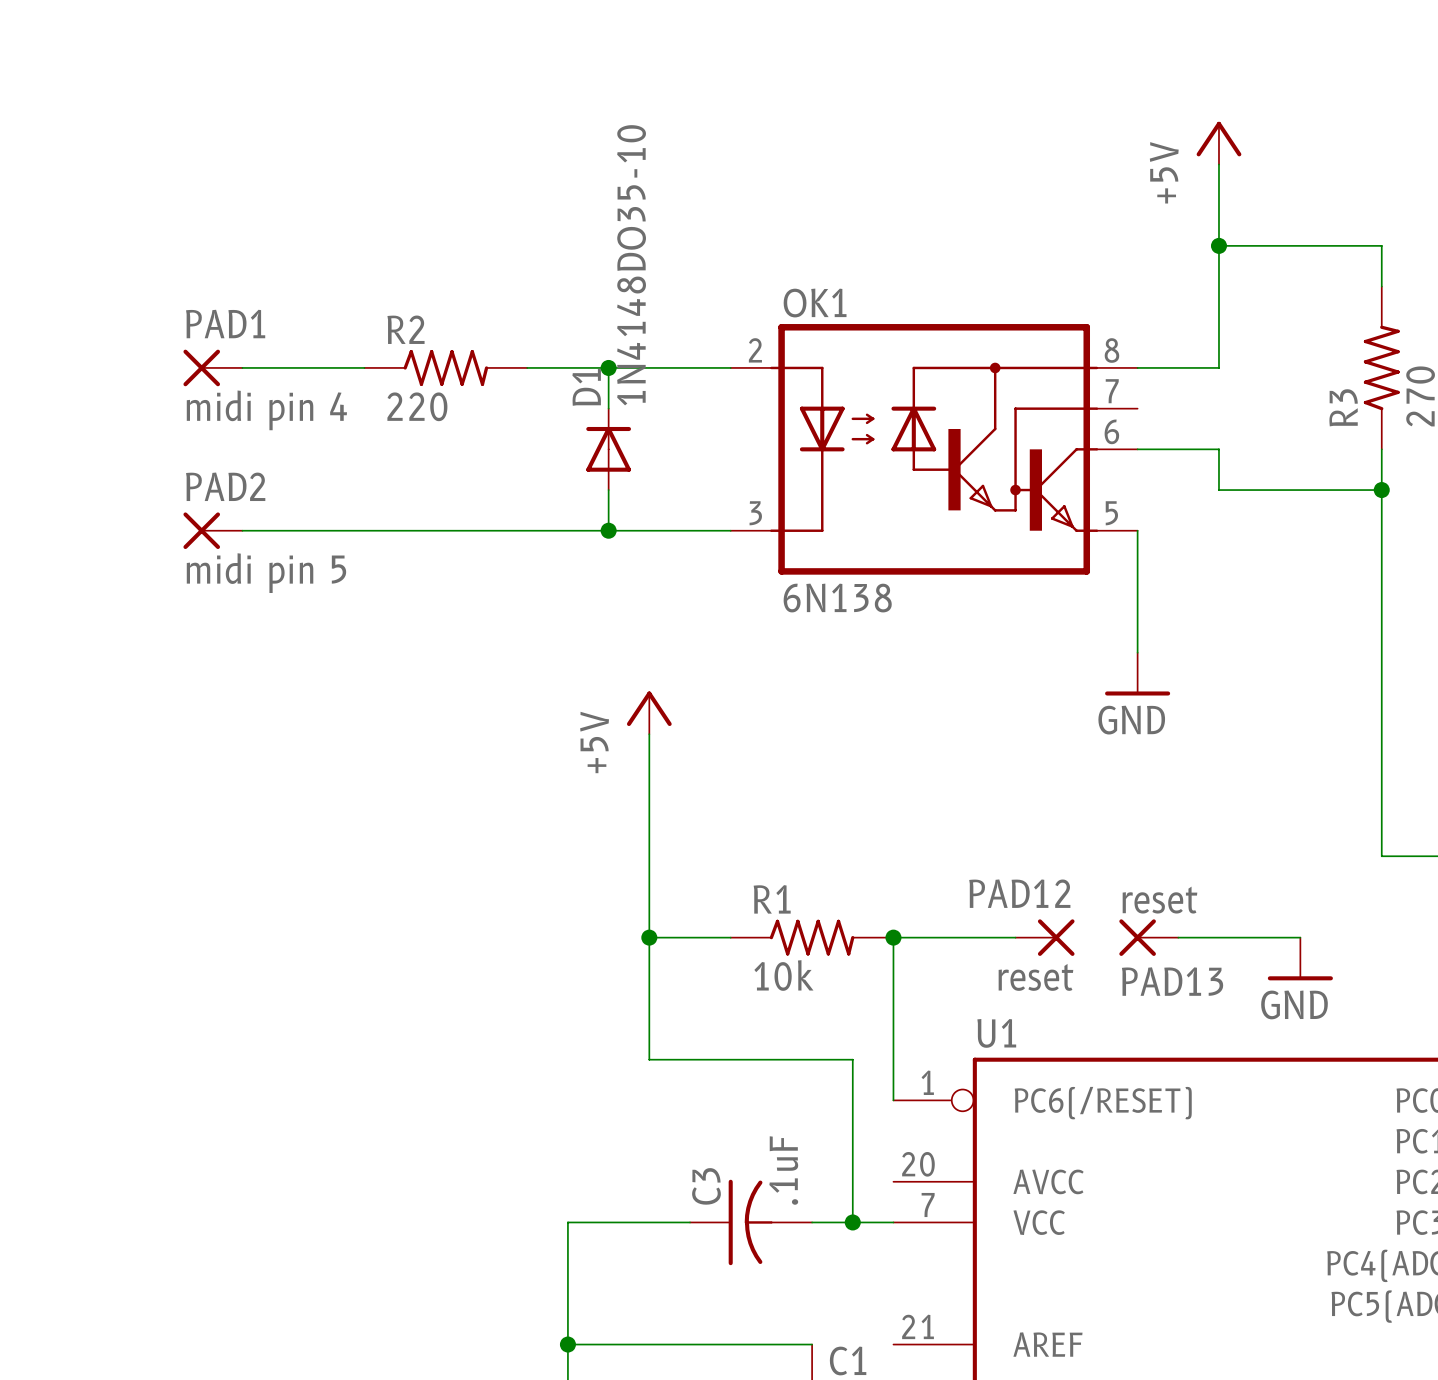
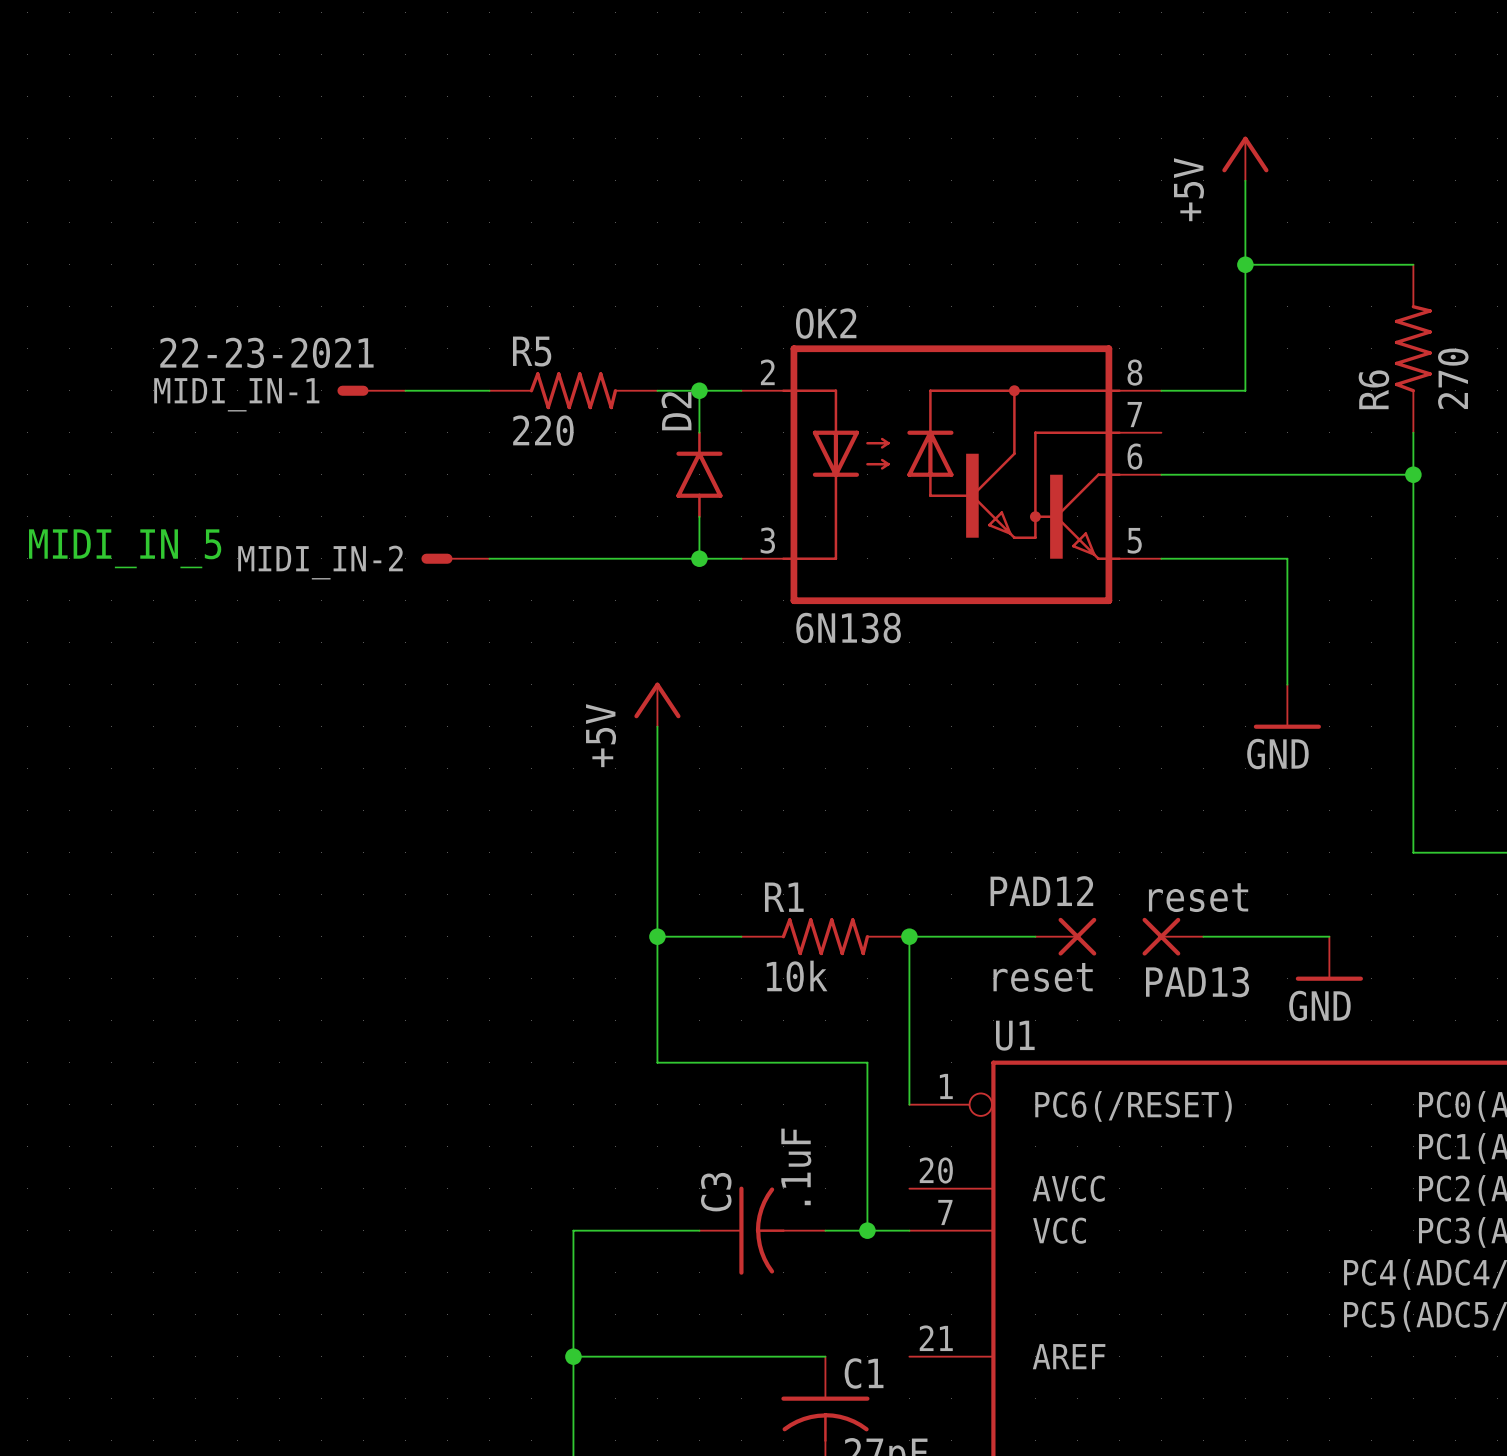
power symbol position: +5V (1218, 143) -> +5V (1245, 158)
wire: (1218, 245) (1381, 245) (1381, 286) -> (1245, 264) (1413, 264)
junction position: (1218, 245) -> (1245, 264)
PAD1: midi pin 4 (212, 367) -> none
wire: (242, 367) (364, 367) -> none
R2: 220 (445, 367) -> none
wire: (527, 367) (730, 367) -> none
wire: (608, 367) (608, 408) -> (699, 390) (699, 432)
junction: (608, 367) -> none
wire: (1137, 367) (1218, 367) -> (1161, 390) (1245, 390) (1245, 348)
R3 name: R3 (1343, 407) -> R6 (1373, 389)
MIDI_IN-1: none -> 22-23-2021 (371, 390)
wire: none -> (405, 390) (489, 390)
R5: none -> 220 (573, 390)
wire: none -> (657, 390) (741, 390)
junction: none -> (699, 390)
D1: 1N4148DO35-10 (608, 449) -> none
OK1: 6N138 (934, 449) -> none
wire: (1137, 449) (1218, 449) (1218, 490) -> (1161, 474) (1245, 474)
wire: (608, 490) (608, 530) -> (699, 516) (699, 558)
D2: none -> (699, 474)
OK2: none -> 6N138 (951, 474)
PAD2: midi pin 5 (212, 530) -> none
wire: (242, 530) (730, 530) -> none
junction: (608, 530) -> none
wire: (1137, 530) (1137, 652) -> none
text: none -> MIDI_IN_5 (125, 548)
MIDI_IN-2: none -> (455, 558)
wire: none -> (489, 558) (741, 558)
junction: none -> (699, 558)
wire: none -> (1161, 558) (1287, 558) (1287, 684)
power symbol position: GND (1137, 674) -> GND (1287, 706)

